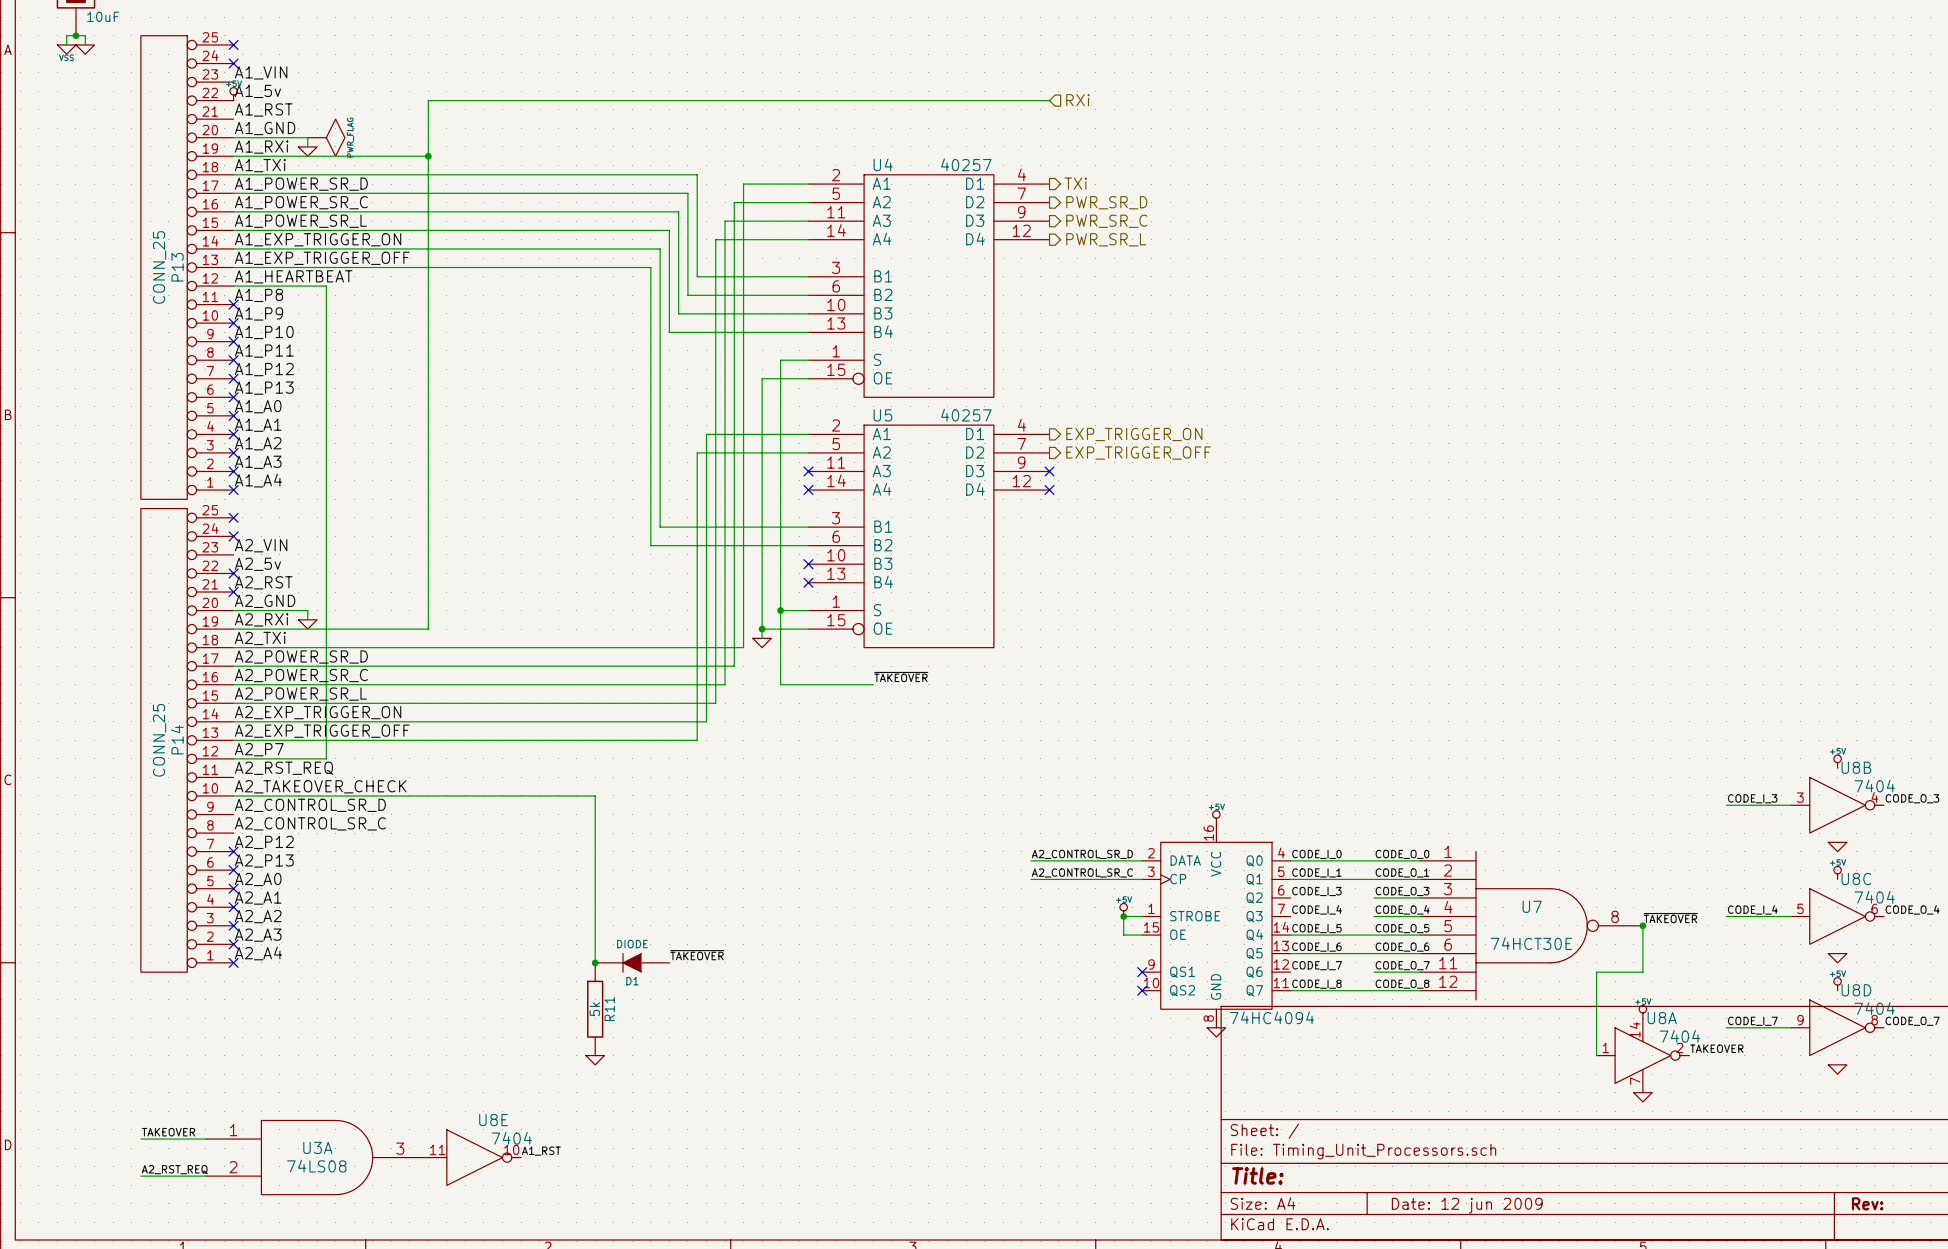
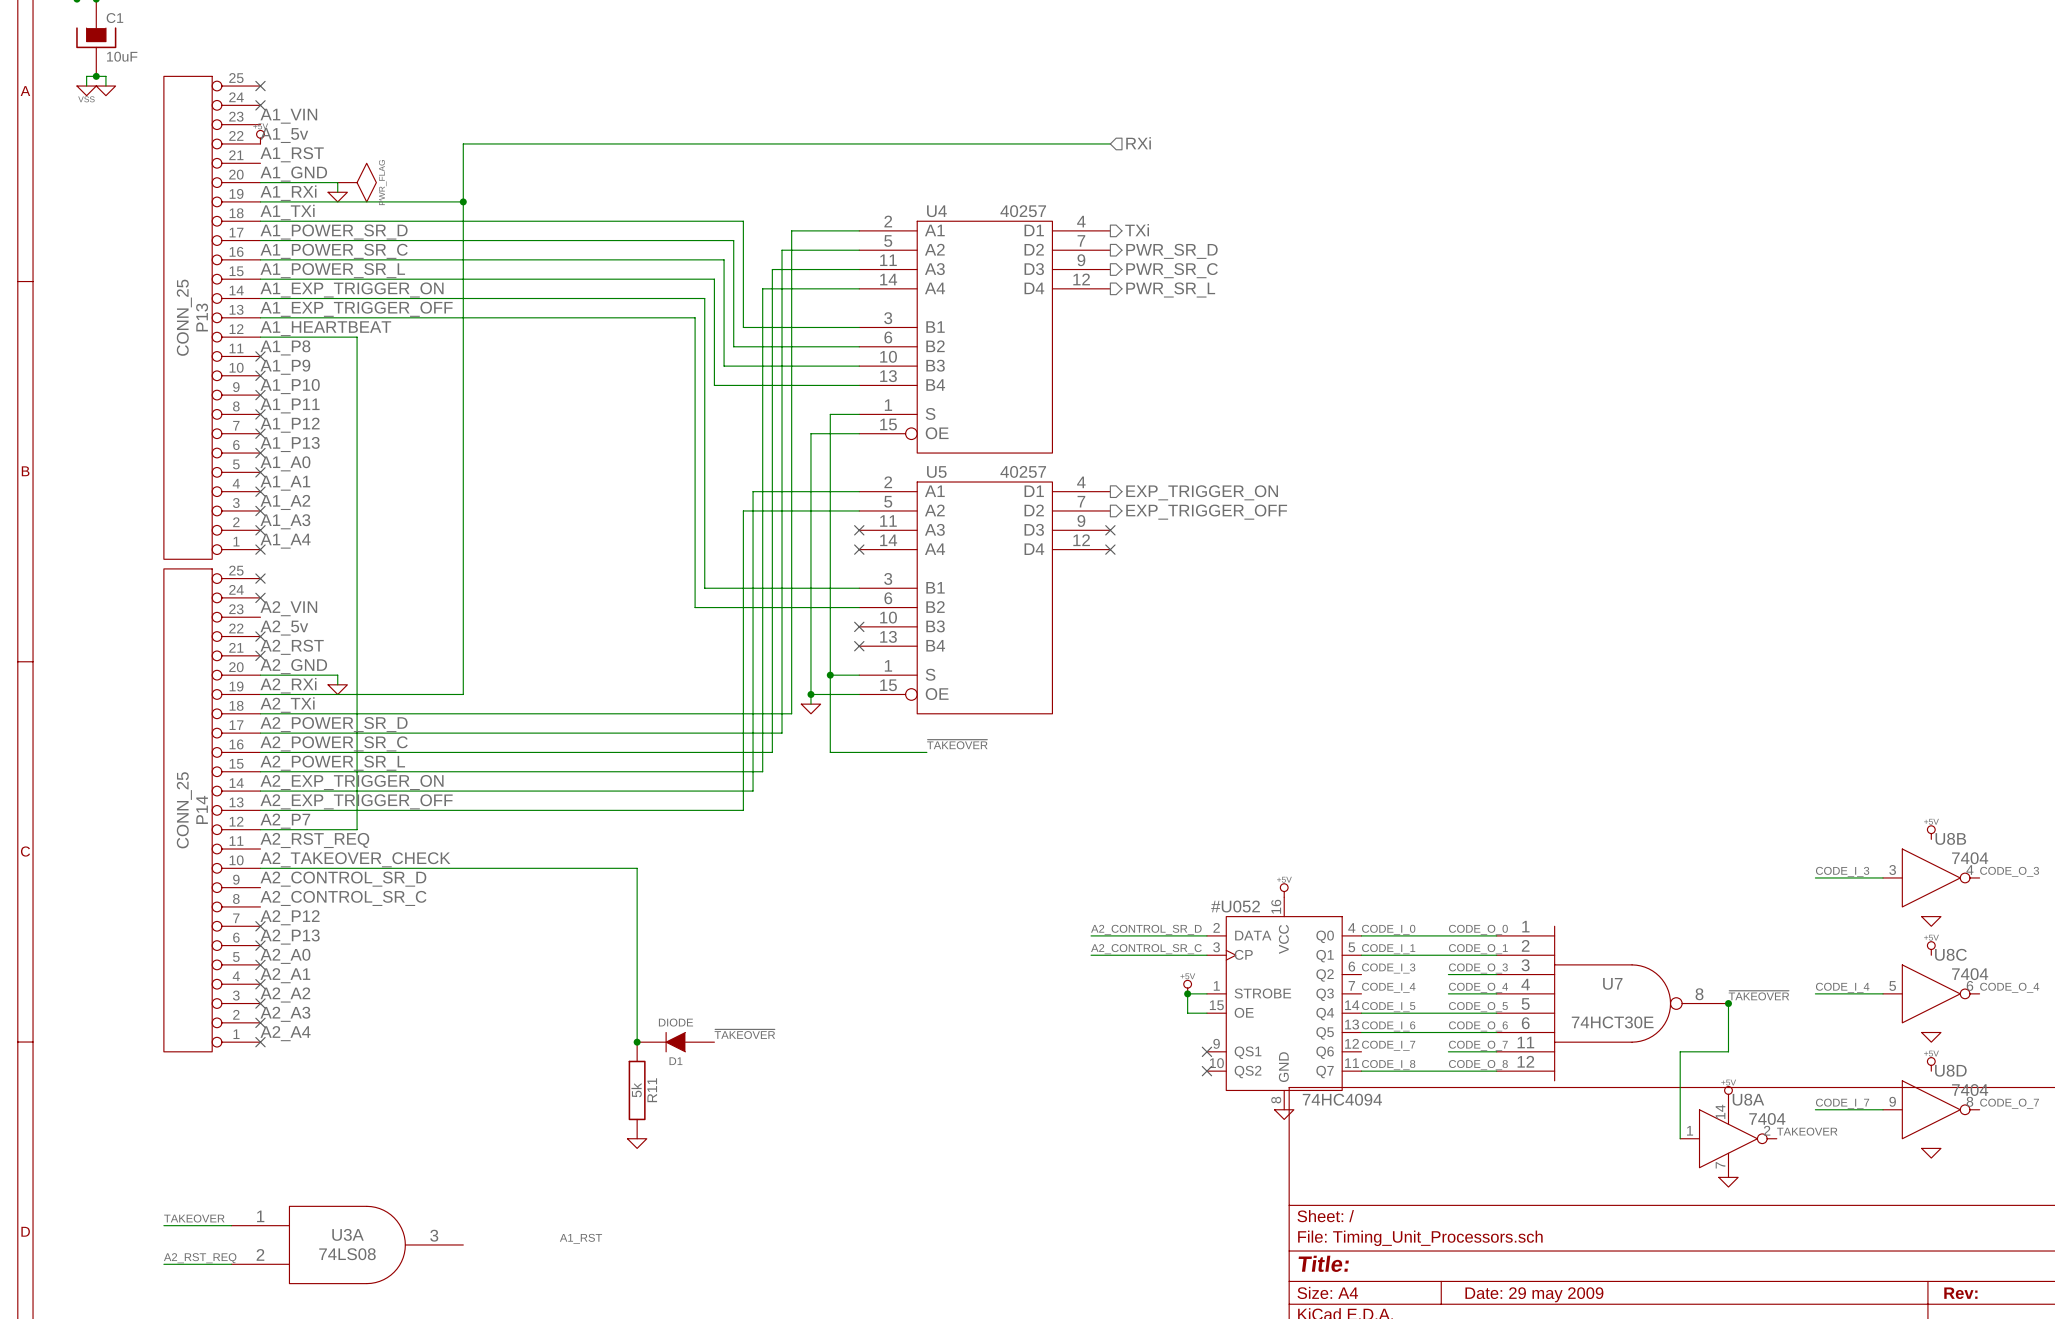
drawing shape: [1142, 823, 1315, 1028] -> [1206, 897, 1382, 1110]
U8E: 7404 (474, 1157) -> none
title block: Date: 12 jun 2009 (1467, 1205) -> Date: 29 may 2009 (1534, 1294)

